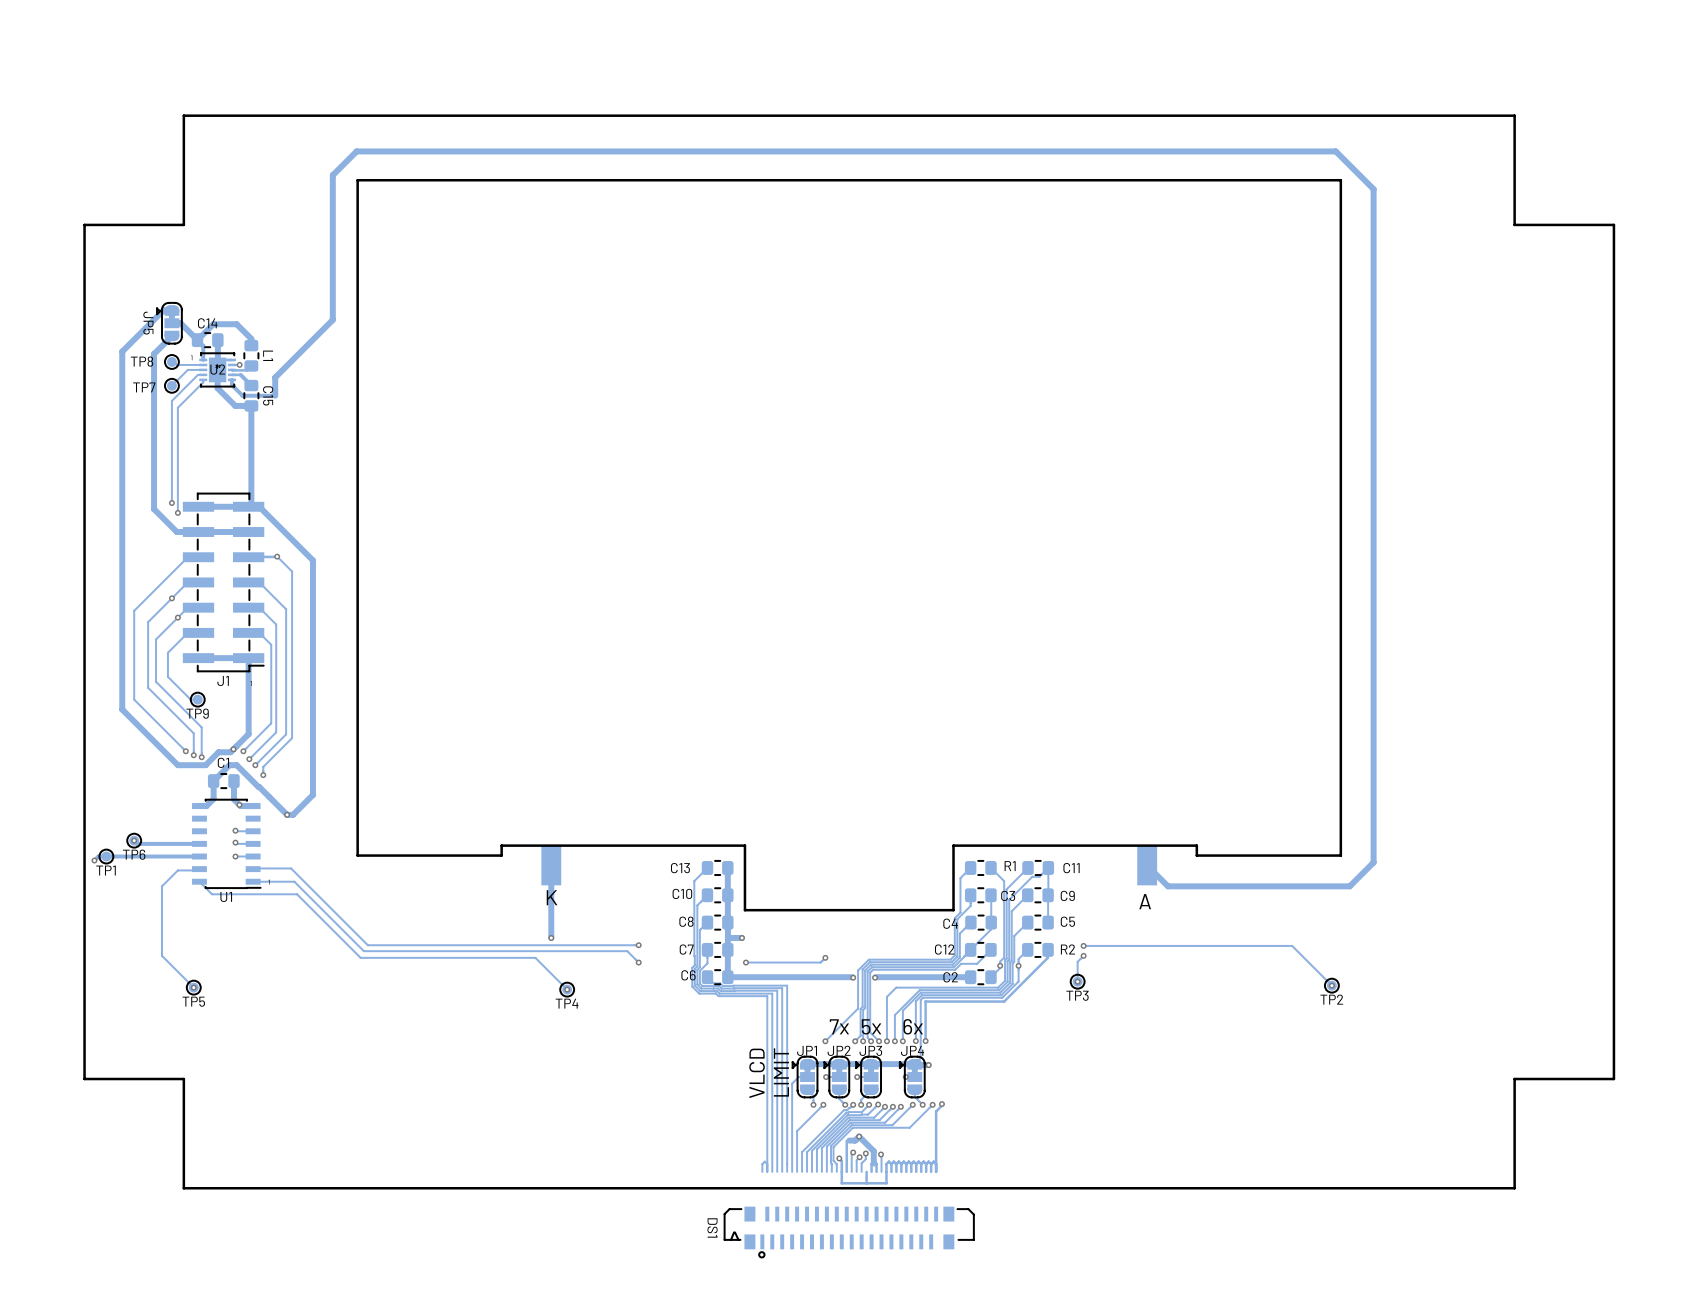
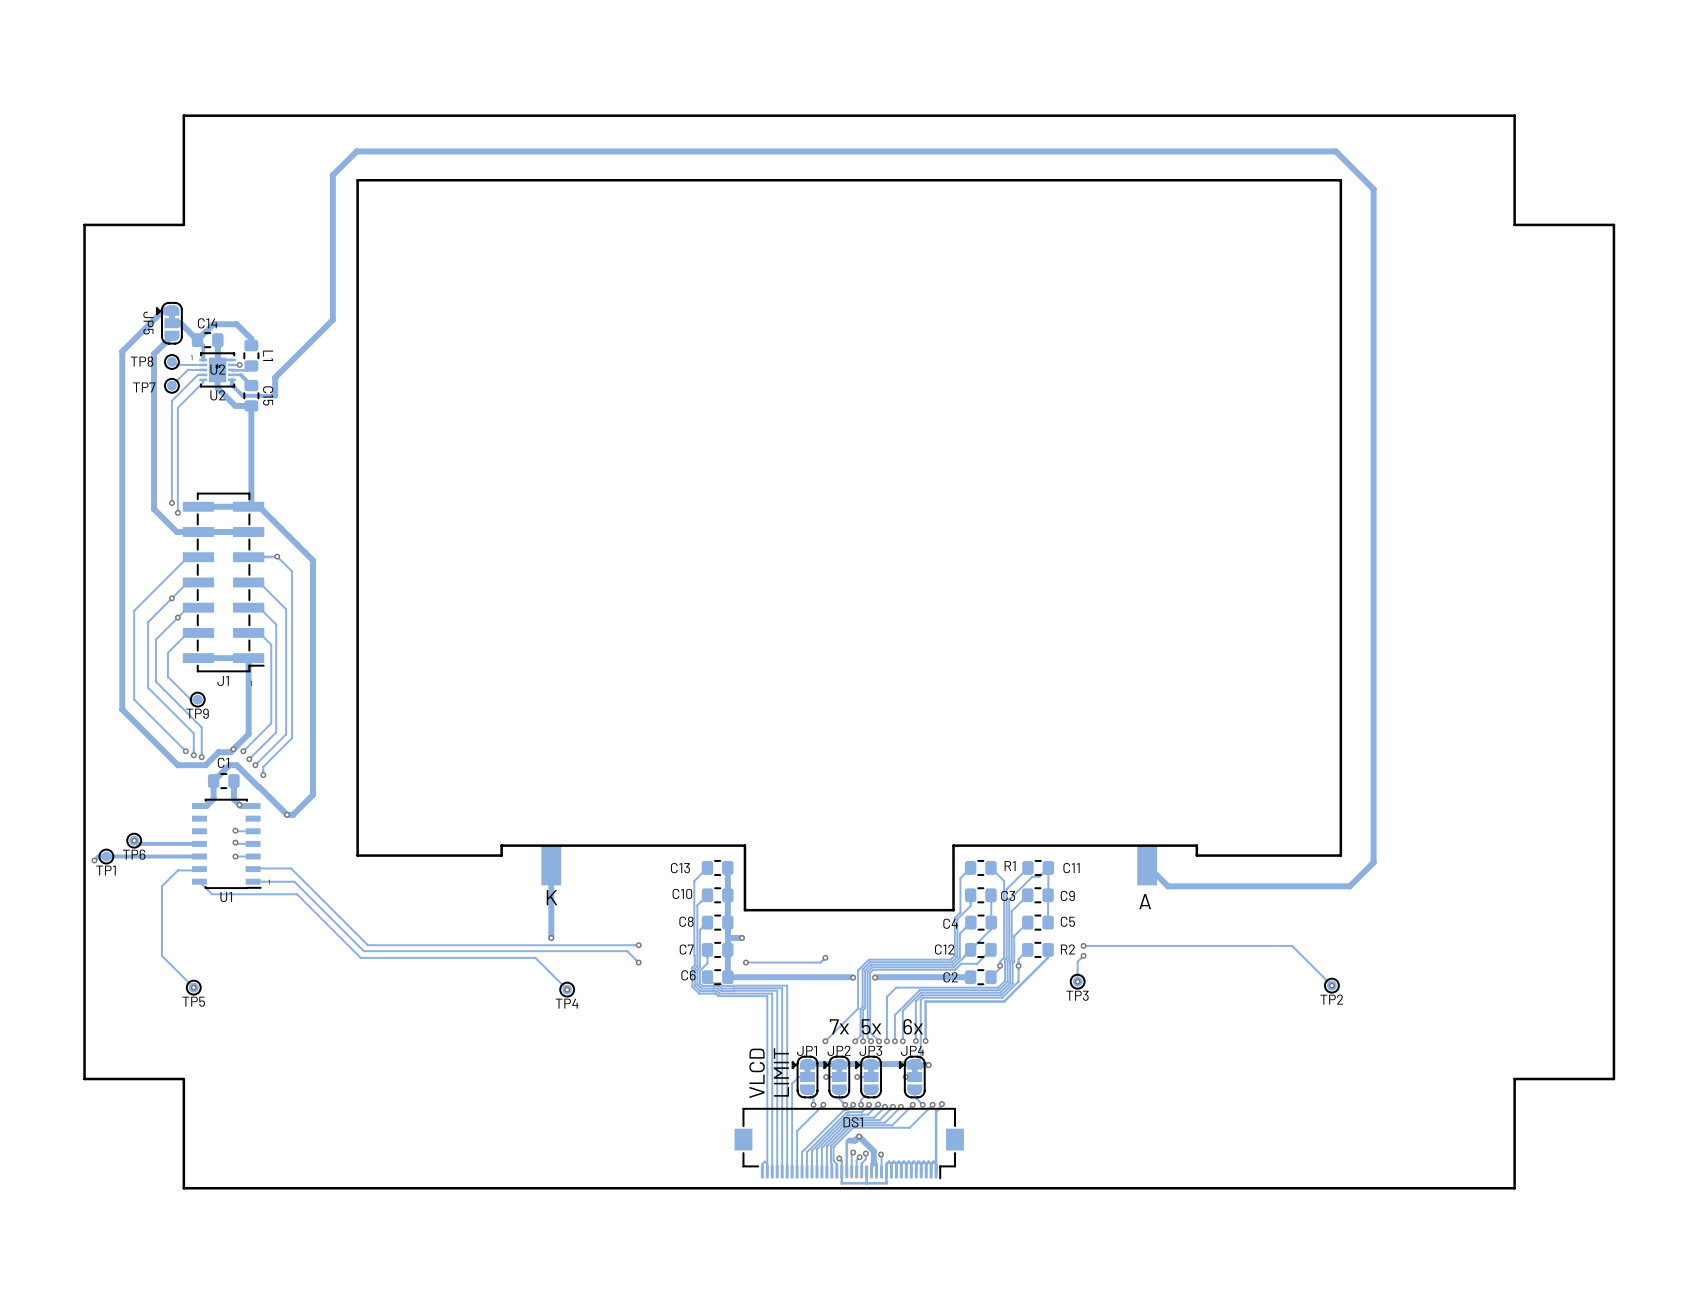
U2 value: none -> U2 (217, 395)
DS1 footprint: [723, 1206, 975, 1259] -> [734, 1108, 964, 1179]
DS1 name position: DS1 (712, 1227) -> DS1 (853, 1122)

